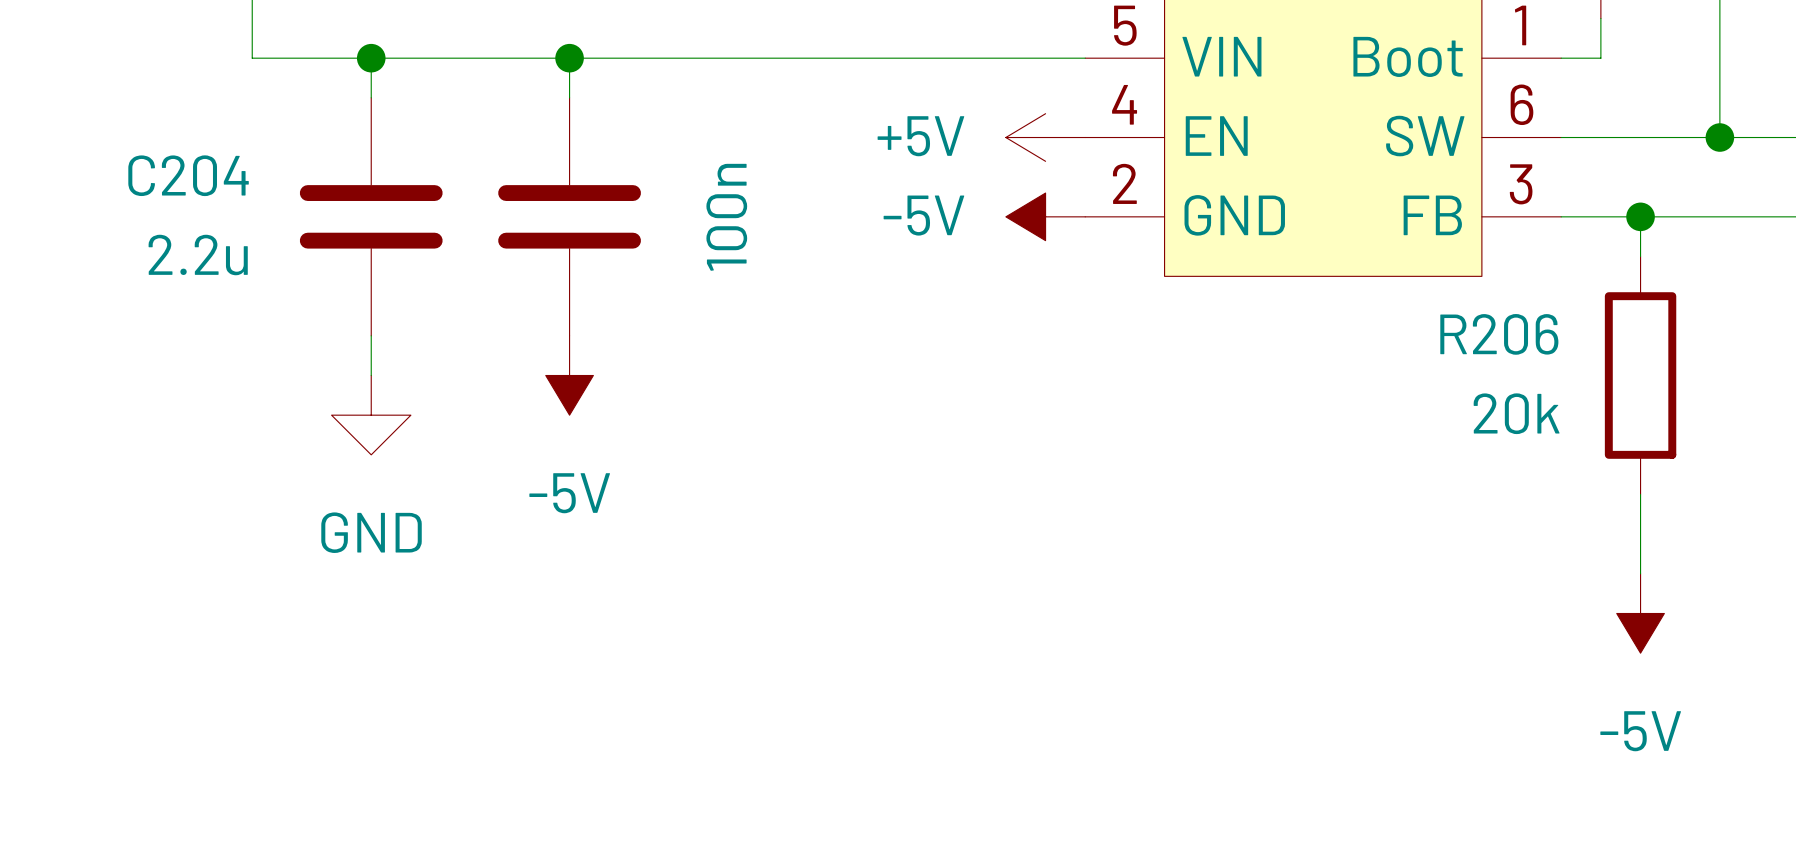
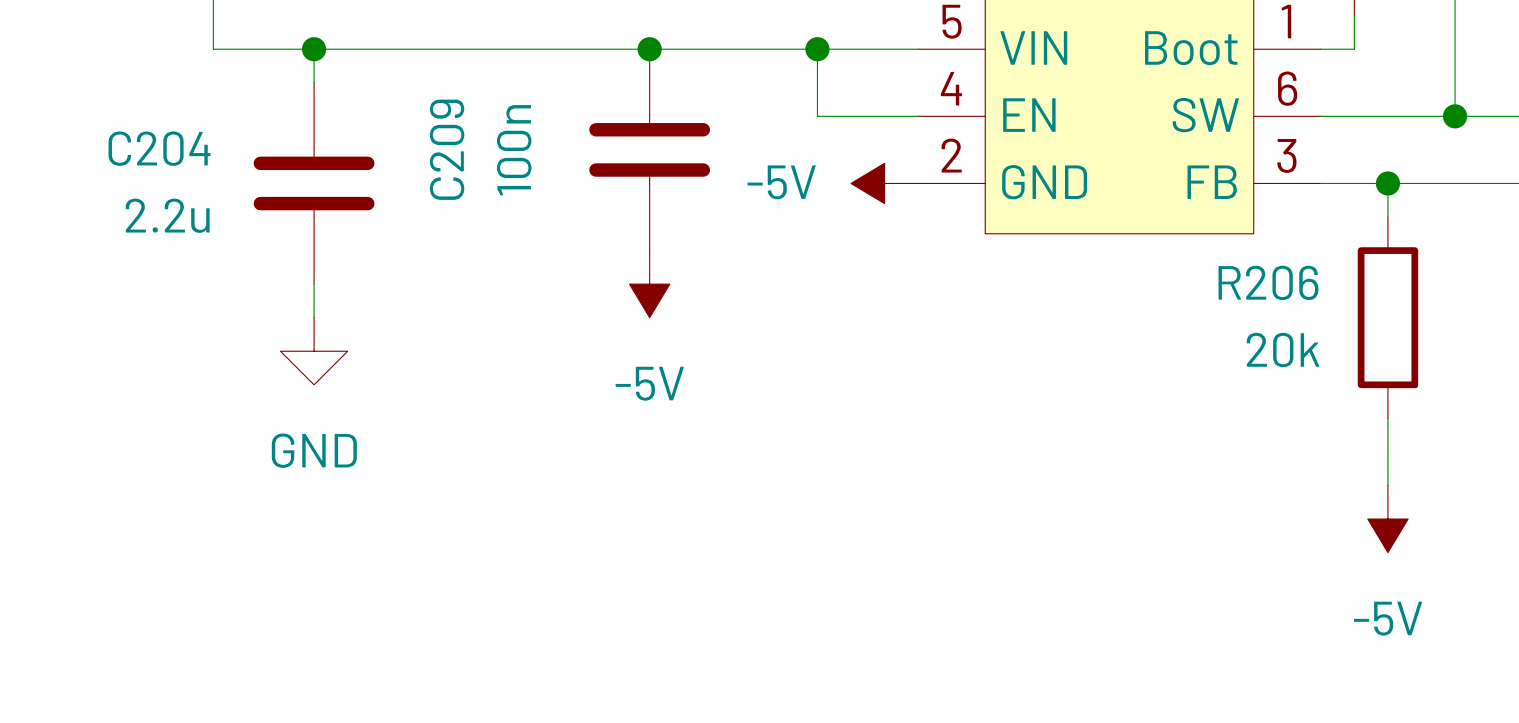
wire: (569, 58) (569, 97) -> none
junction: (569, 58) -> none
junction: none -> (649, 49)
wire: none -> (817, 49) (817, 116) (918, 116)
junction: none -> (817, 49)
power symbol: +5V (1045, 137) -> none
C209: none -> 100n (649, 149)
part: 100n (569, 216) -> none
power symbol position: -5V (569, 375) -> -5V (649, 284)

